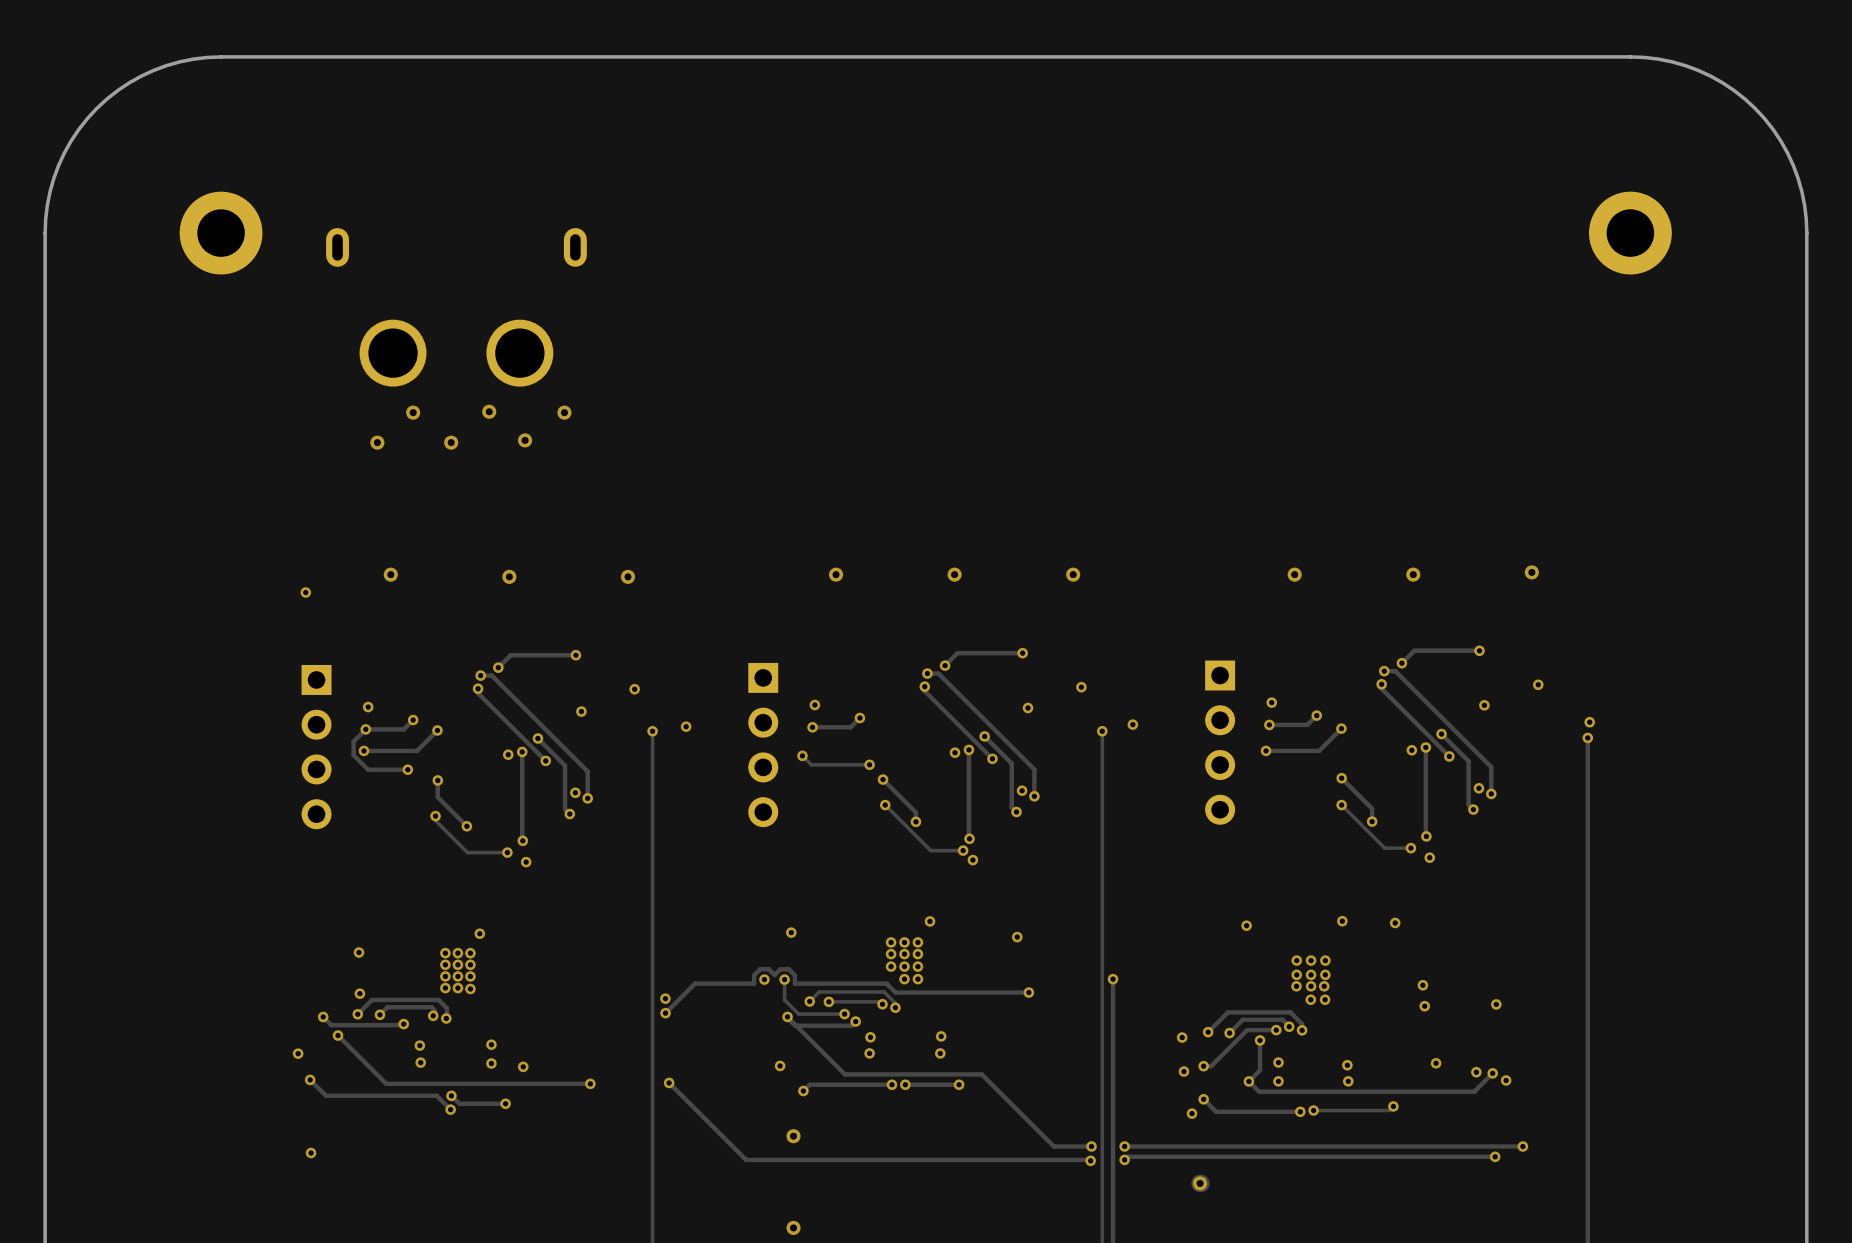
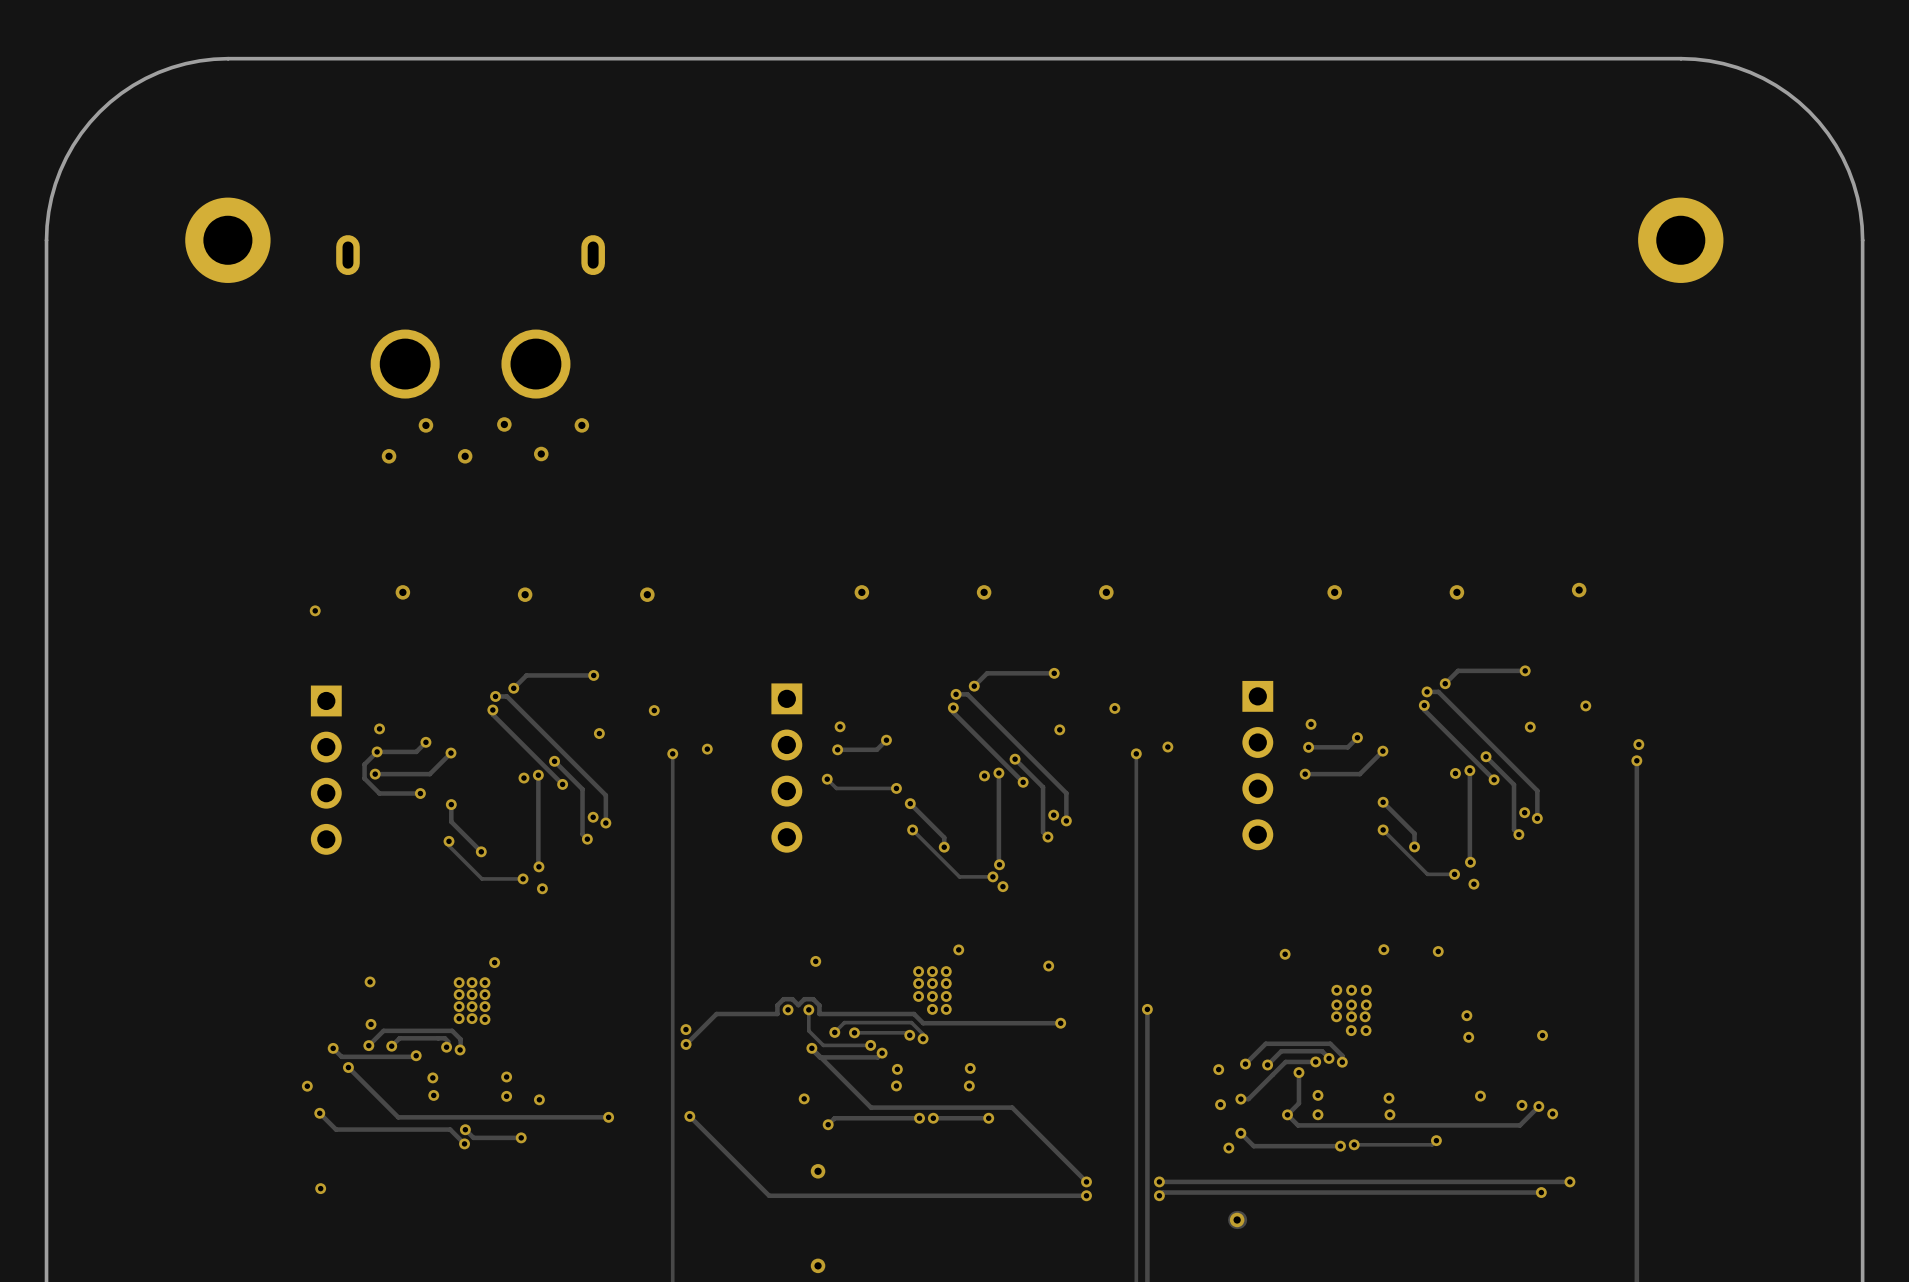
via: none -> (1086, 1181)
track: (1091, 1146) (1053, 1146) -> none
via: (1091, 1146) -> none
track: (1053, 1159) (1090, 1160) -> none
via: none -> (1086, 1195)
via: (1090, 1160) -> none

